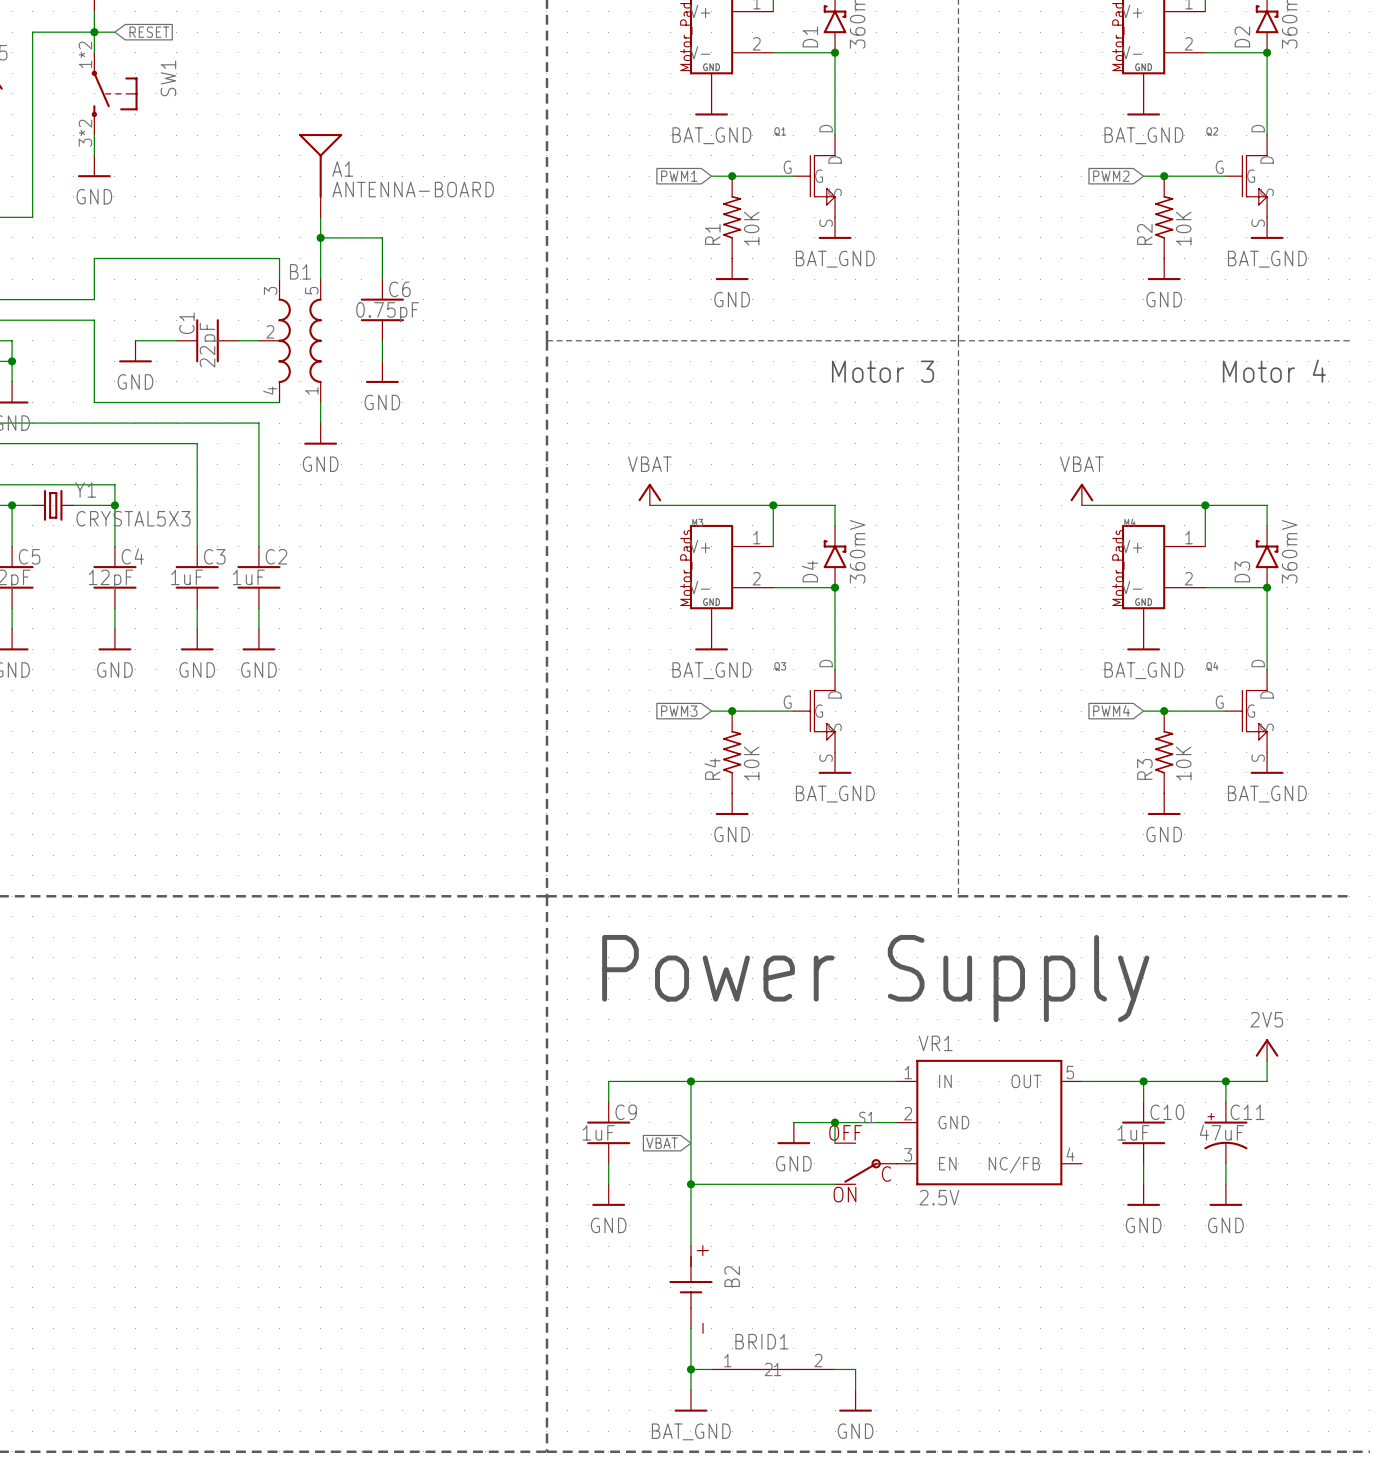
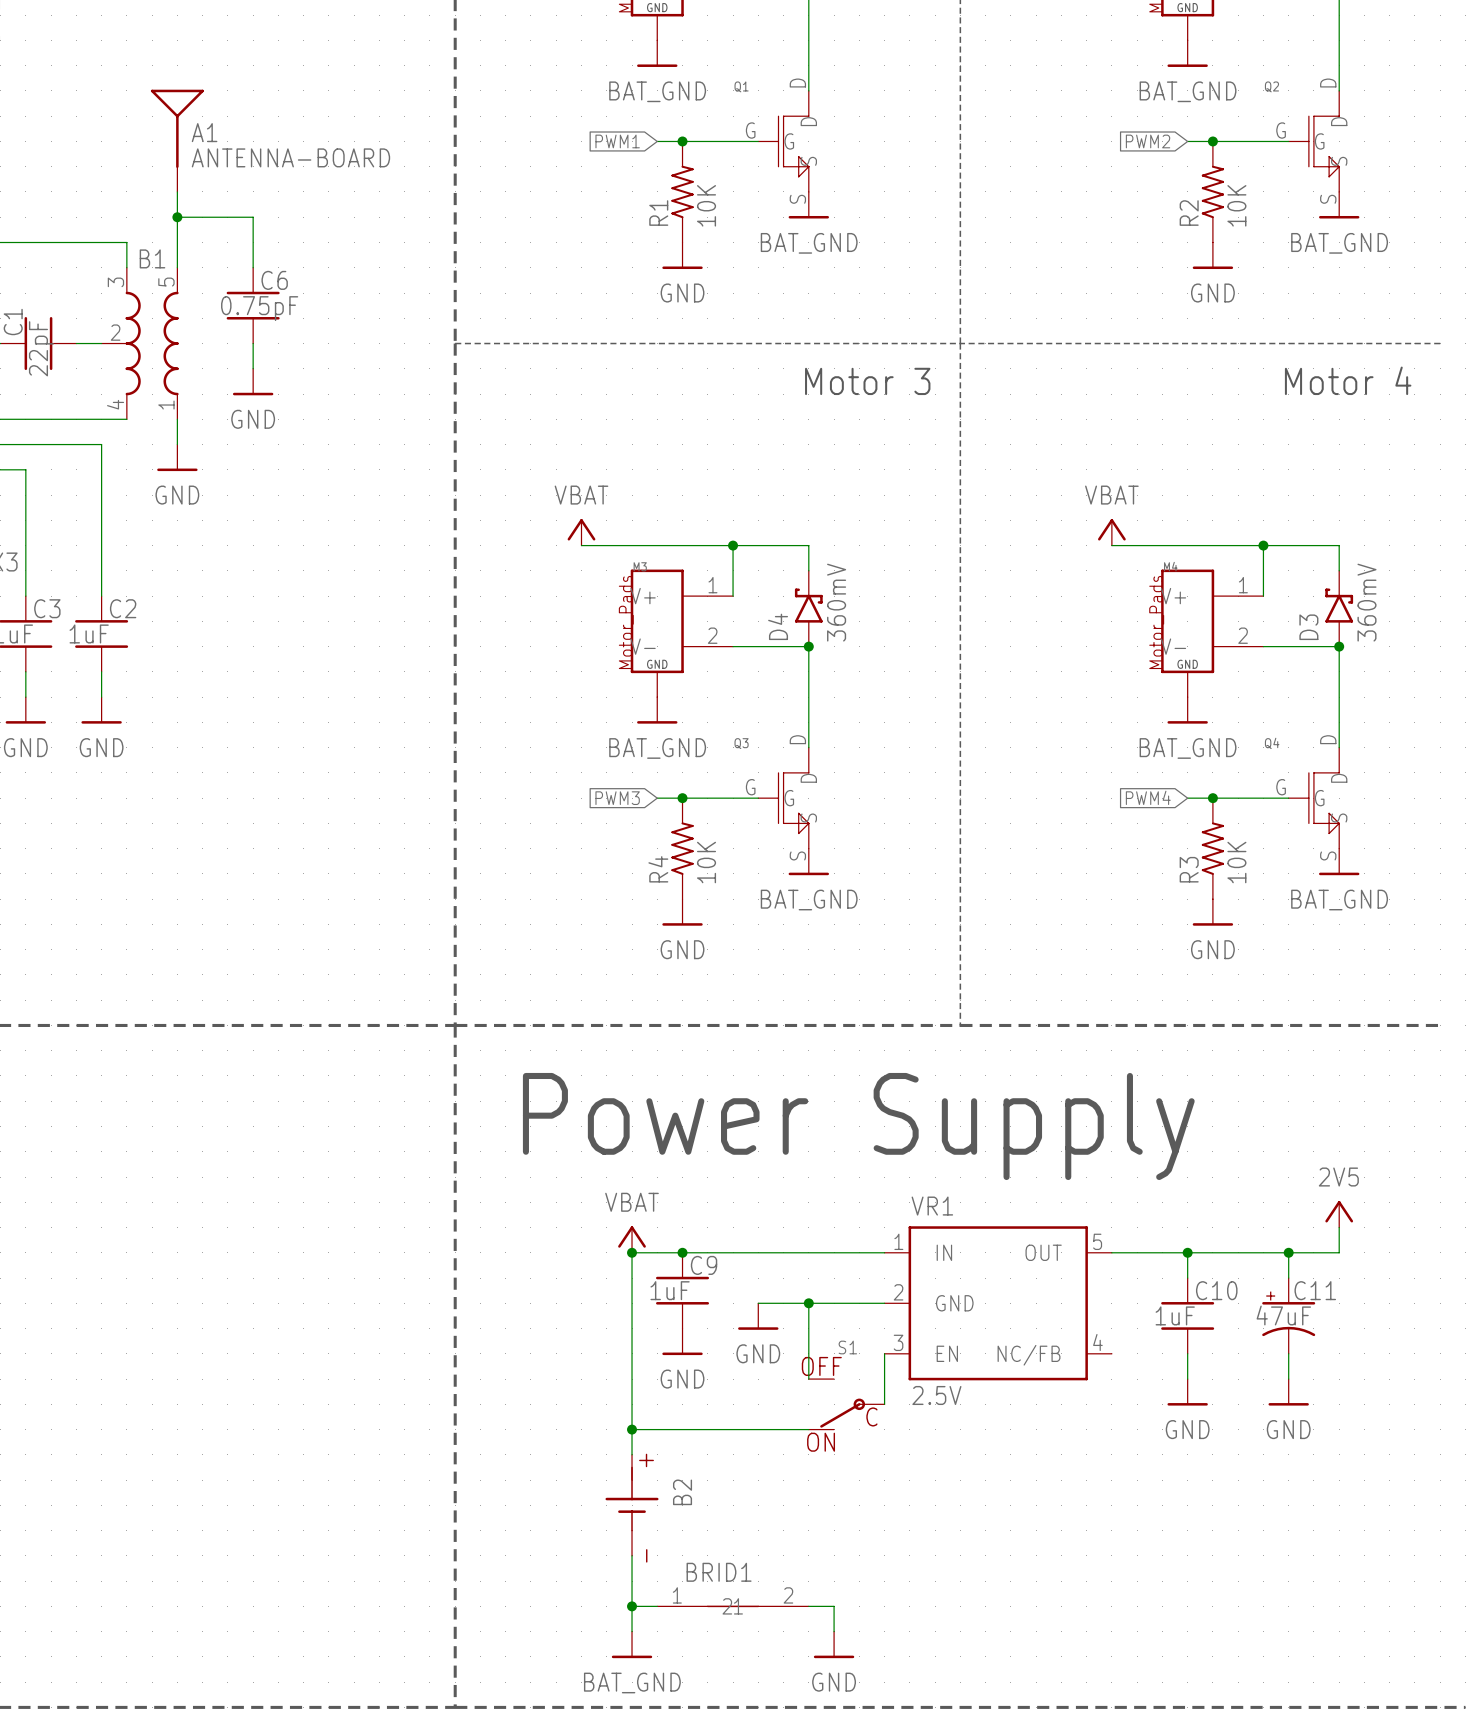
power symbol: none -> VBAT (632, 1239)
wire: (690, 1081) (608, 1081) (608, 1102) -> none
junction: none -> (682, 1252)
C9 position: (608, 1132) -> (682, 1290)
global label: VBAT (662, 1143) -> none
wire: (608, 1163) (608, 1184) -> none
S1 position: (865, 1163) -> (846, 1404)
wire: none -> (884, 1353) (884, 1404)
wire: (690, 1184) (835, 1184) -> (808, 1328) (808, 1379)
junction position: (690, 1184) -> (632, 1429)
power symbol position: GND (608, 1195) -> GND (682, 1341)
wire: none -> (632, 1429) (808, 1429)

